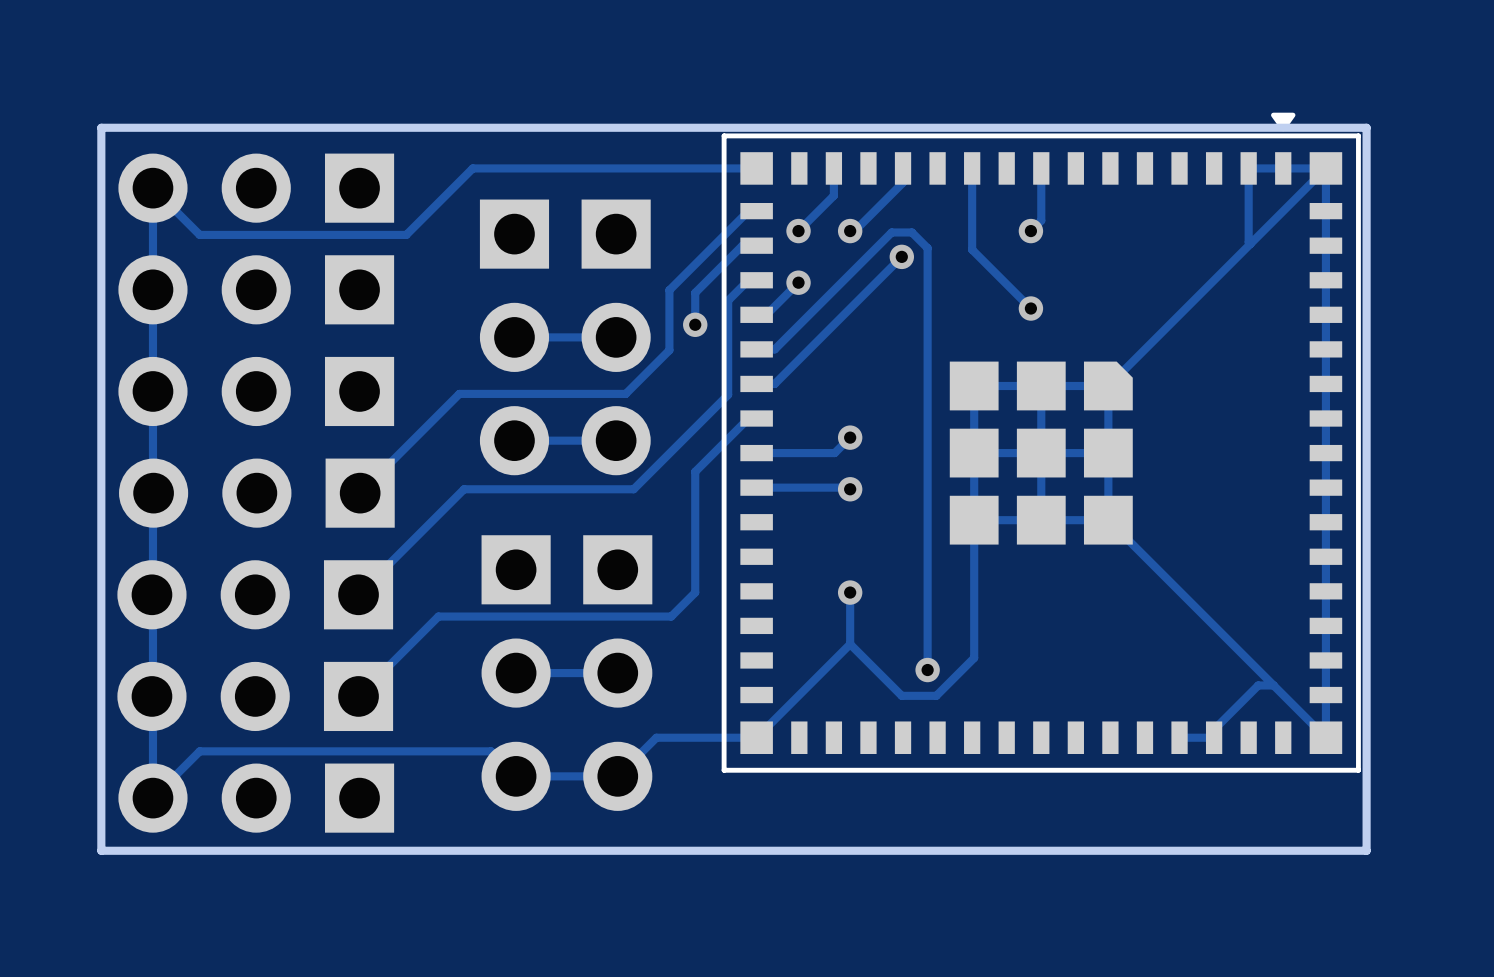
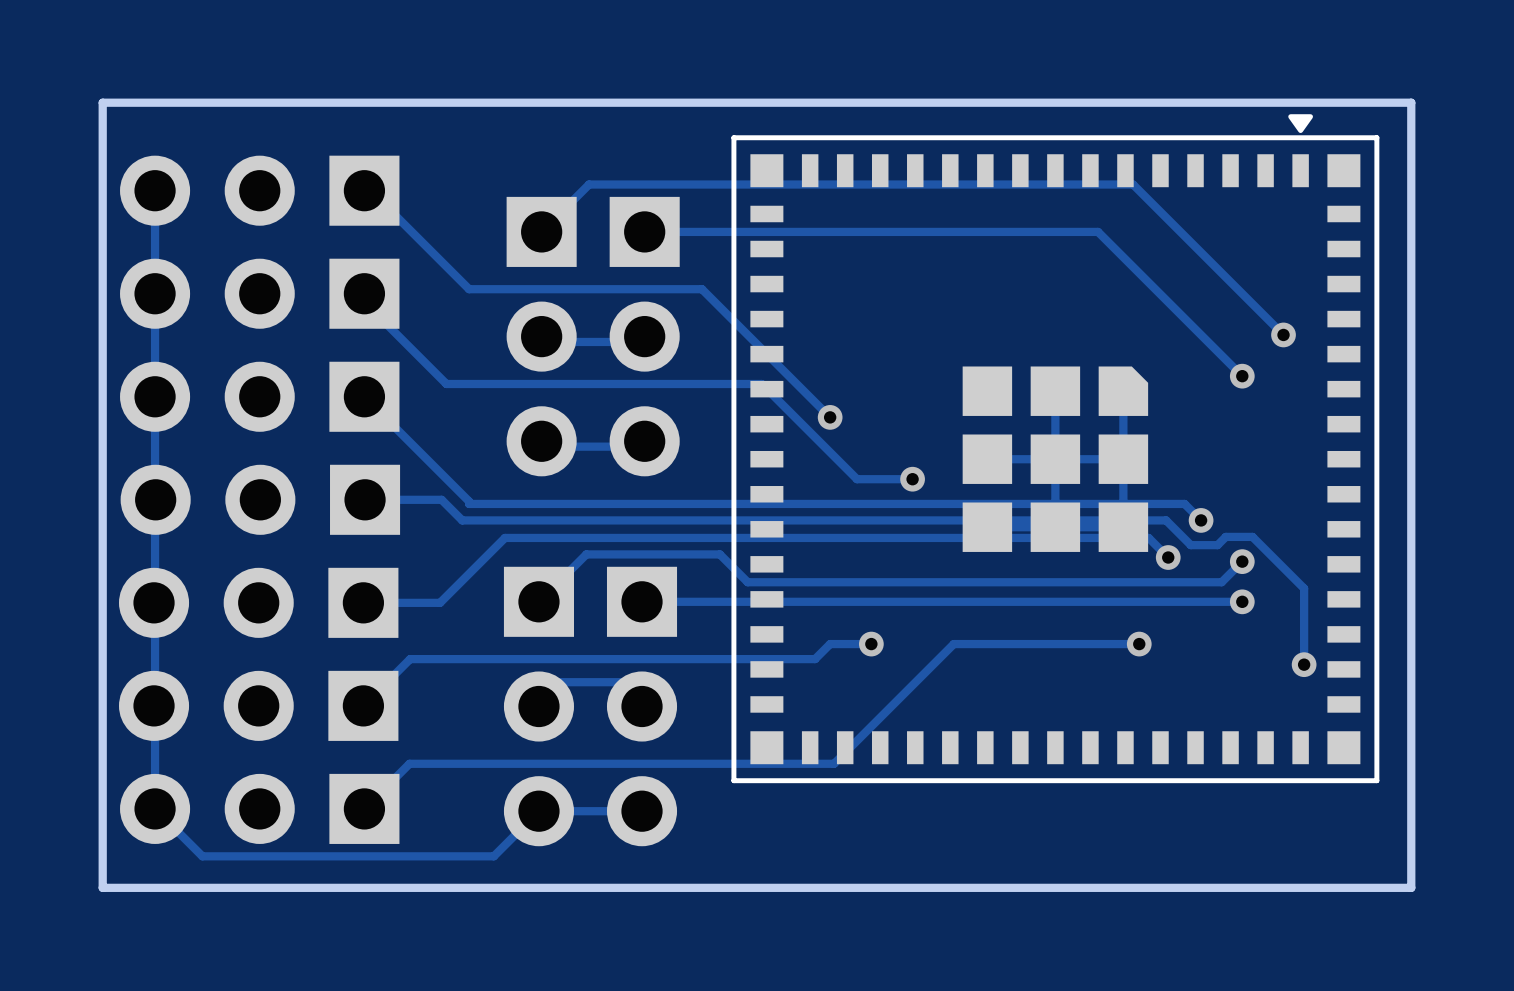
board edge: (101, 127) (1366, 127) (1366, 850) (101, 850) -> (102, 129) (102, 102) (1411, 102) (1411, 887) (102, 887) (102, 862)
track: (756, 168) (472, 168) (406, 234) (199, 234) (152, 188) -> none
track: (833, 168) (833, 195) (798, 231) -> none
track: (903, 168) (903, 182) (854, 231) (850, 231) -> none
track: (972, 168) (972, 249) (1030, 308) -> none
track: (1041, 168) (1041, 220) (1030, 231) -> none
track: (1325, 168) (1248, 168) (1248, 242) (1250, 243) -> none
track: (1325, 168) (1325, 737) (1108, 520) -> none
track: (1325, 168) (1108, 385) (974, 385) (974, 657) (936, 695) (901, 695) (850, 644) -> none
track: none -> (364, 190) (370, 190) (469, 289) (701, 289) (830, 417)
track: (756, 211) (748, 211) (669, 290) (669, 350) (625, 393) (459, 393) (360, 493) -> (1304, 664) (1304, 588) (1252, 536) (1225, 536) (1217, 545) (1190, 545) (1166, 520) (462, 520) (441, 499) (365, 499)
track: none -> (541, 231) (589, 184) (1133, 184) (1283, 334)
track: none -> (644, 231) (1098, 231) (1242, 376)
via: (798, 231) -> none
via: (850, 231) -> none
via: (1030, 231) -> none
track: (756, 245) (742, 245) (695, 292) (695, 324) -> none
track: (901, 256) (774, 383) (756, 383) -> none
via: (901, 256) -> none
track: (756, 280) (748, 280) (728, 300) (728, 394) (633, 489) (464, 489) (358, 594) -> (1168, 557) (1148, 537) (504, 537) (440, 602) (363, 602)
track: (798, 282) (766, 314) (756, 314) -> none
via: (798, 282) -> none
track: none -> (364, 293) (364, 301) (446, 384) (761, 384) (857, 479) (912, 479)
via: (1030, 308) -> none
via: (695, 324) -> none
via: none -> (1283, 334)
part position: (514, 337) -> (541, 336)
part position: (616, 337) -> (644, 336)
track: (756, 349) (774, 349) (891, 232) (911, 232) (927, 248) (927, 670) -> none
via: none -> (1242, 376)
track: none -> (364, 396) (469, 501) (469, 503) (1184, 503) (1201, 520)
via: none -> (830, 417)
track: (756, 418) (748, 418) (695, 471) (695, 592) (671, 616) (438, 616) (404, 650) -> (871, 644) (830, 644) (815, 659) (410, 659)
track: (850, 437) (834, 453) (756, 453) -> none
via: (850, 437) -> none
via: none -> (912, 479)
track: (756, 487) (848, 487) (850, 489) -> none
via: (850, 489) -> none
via: none -> (1201, 520)
via: none -> (1168, 557)
track: none -> (1242, 561) (1221, 582) (747, 582) (719, 554) (586, 554) (538, 601)
via: none -> (1242, 561)
track: (850, 592) (850, 644) -> none
via: (850, 592) -> none
track: none -> (1242, 601) (642, 601)
via: none -> (1242, 601)
via: none -> (871, 644)
track: none -> (1139, 644) (953, 644) (834, 763) (409, 763) (364, 808)
via: none -> (1139, 644)
track: (850, 644) (756, 737) (656, 737) (617, 776) (516, 776) (491, 751) (199, 751) (152, 798) -> (642, 811) (538, 811) (493, 856) (202, 856) (155, 808)
via: none -> (1304, 664)
via: (927, 670) -> none
part position: (516, 673) -> (538, 706)
part position: (617, 673) -> (642, 706)
track: (1273, 685) (1258, 685) (1214, 729) (1214, 737) (1179, 737) -> none

